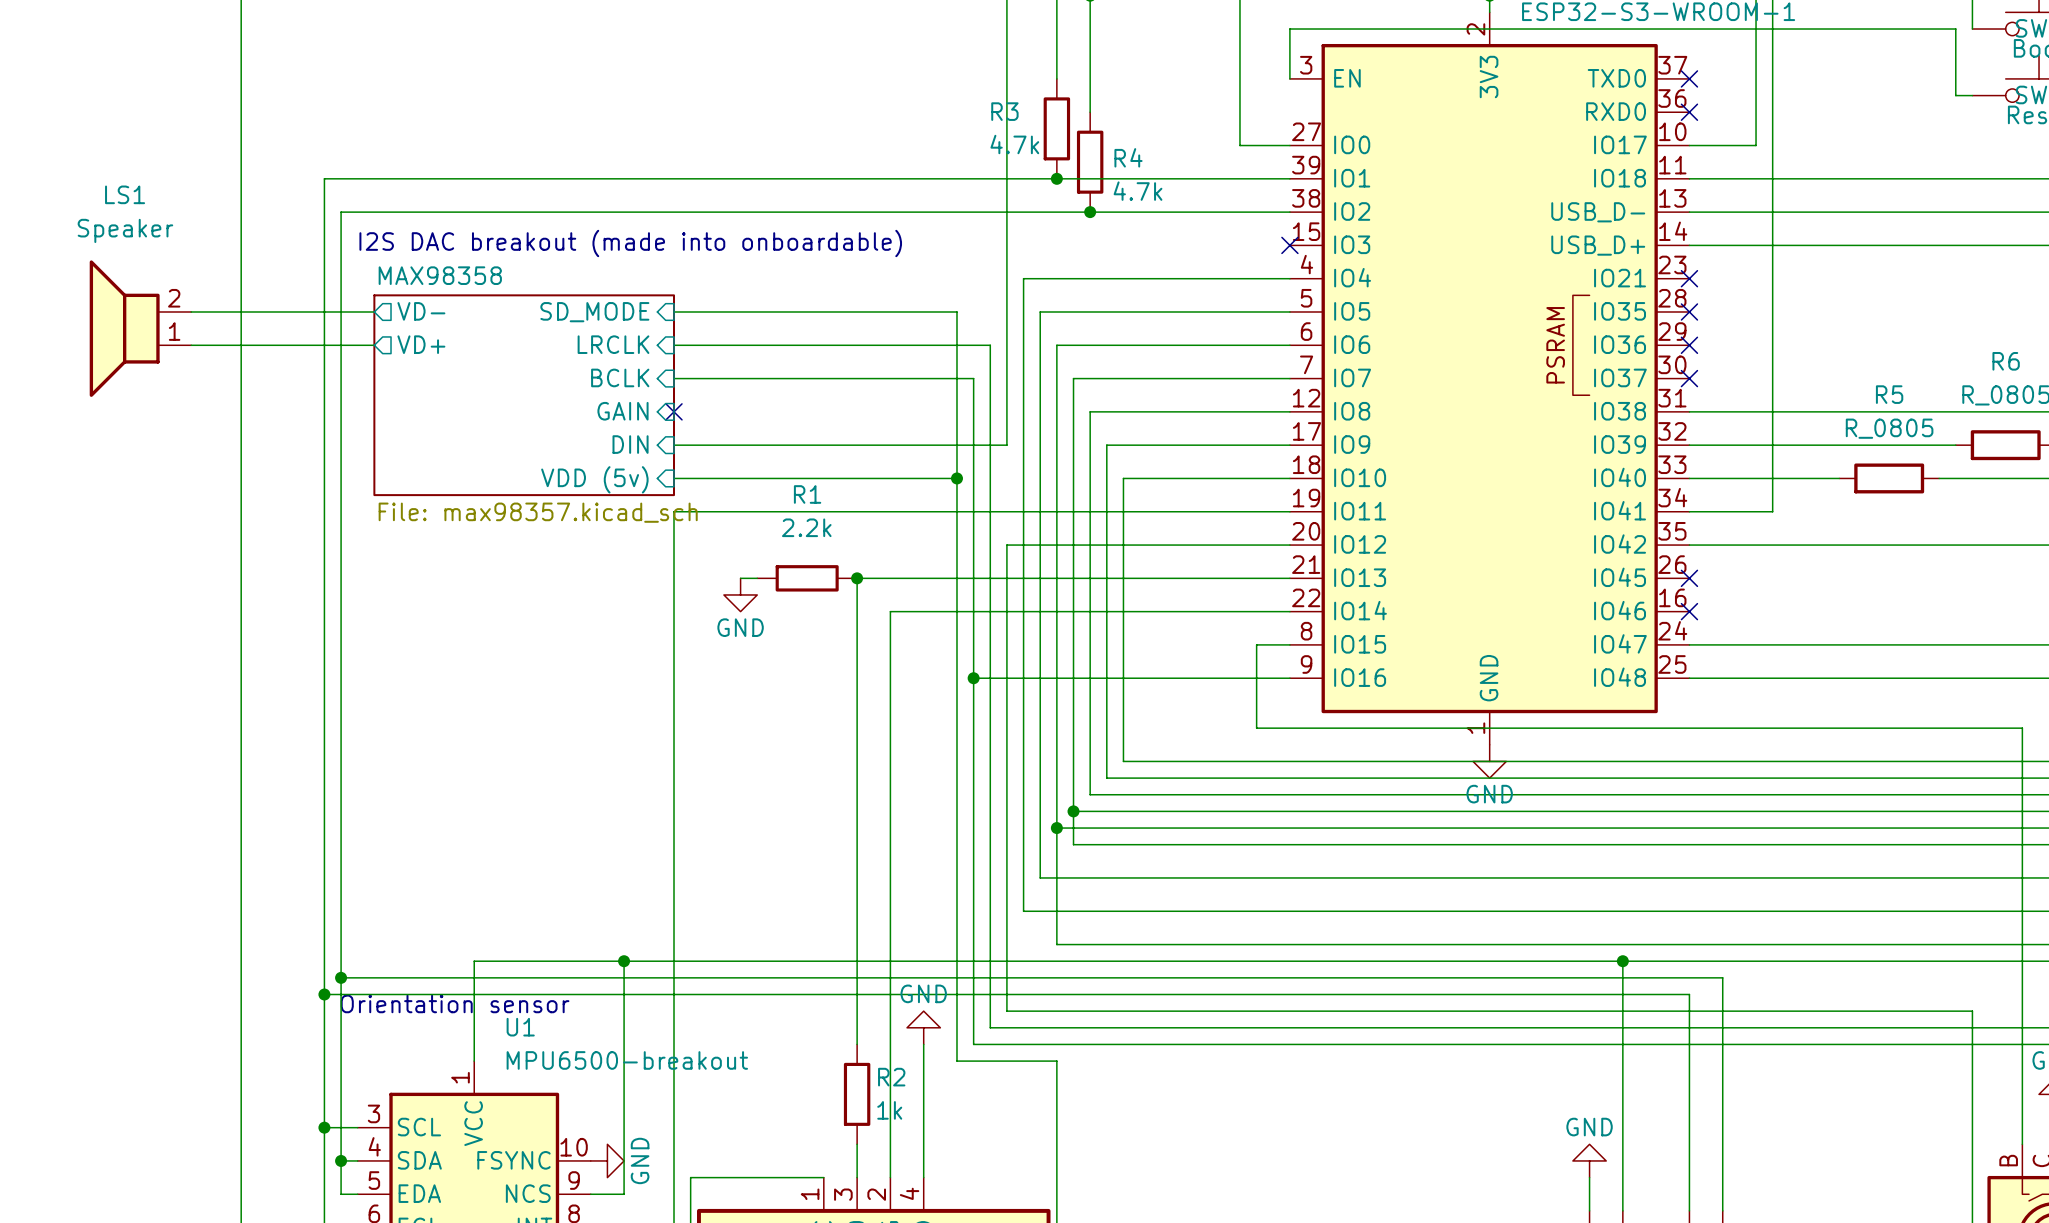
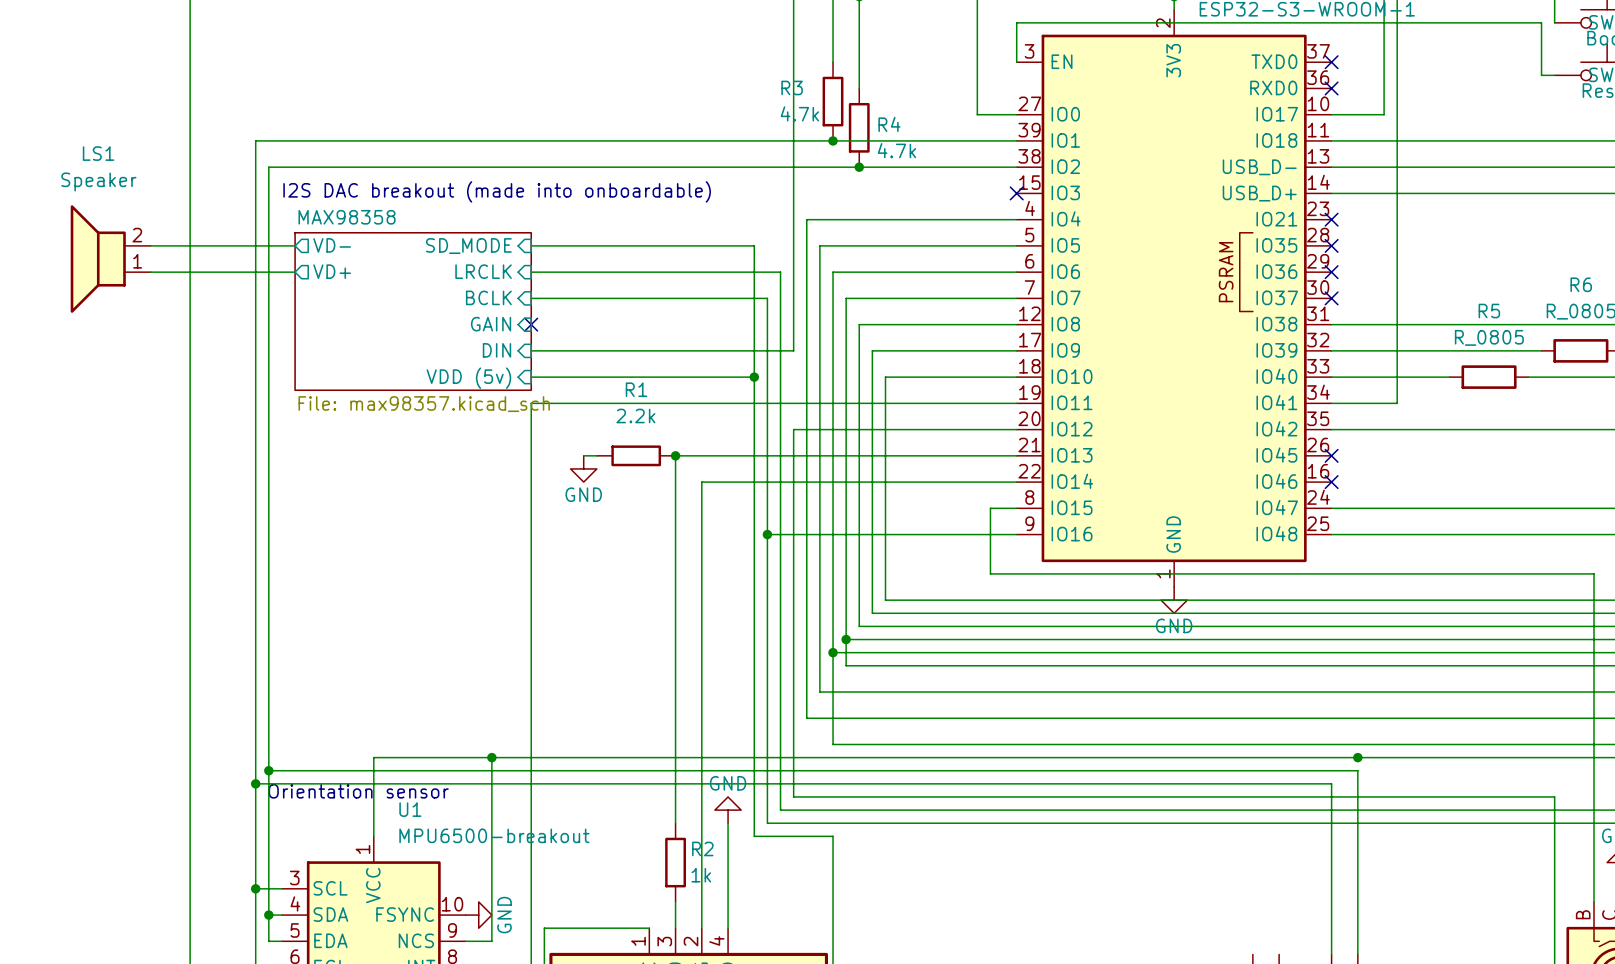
wire: (1622, 961) (1622, 1210) -> none
junction: (1622, 961) -> none
junction: none -> (1357, 757)
power symbol: GND (1589, 1160) -> none
wire: (1589, 1177) (1589, 1210) -> none

